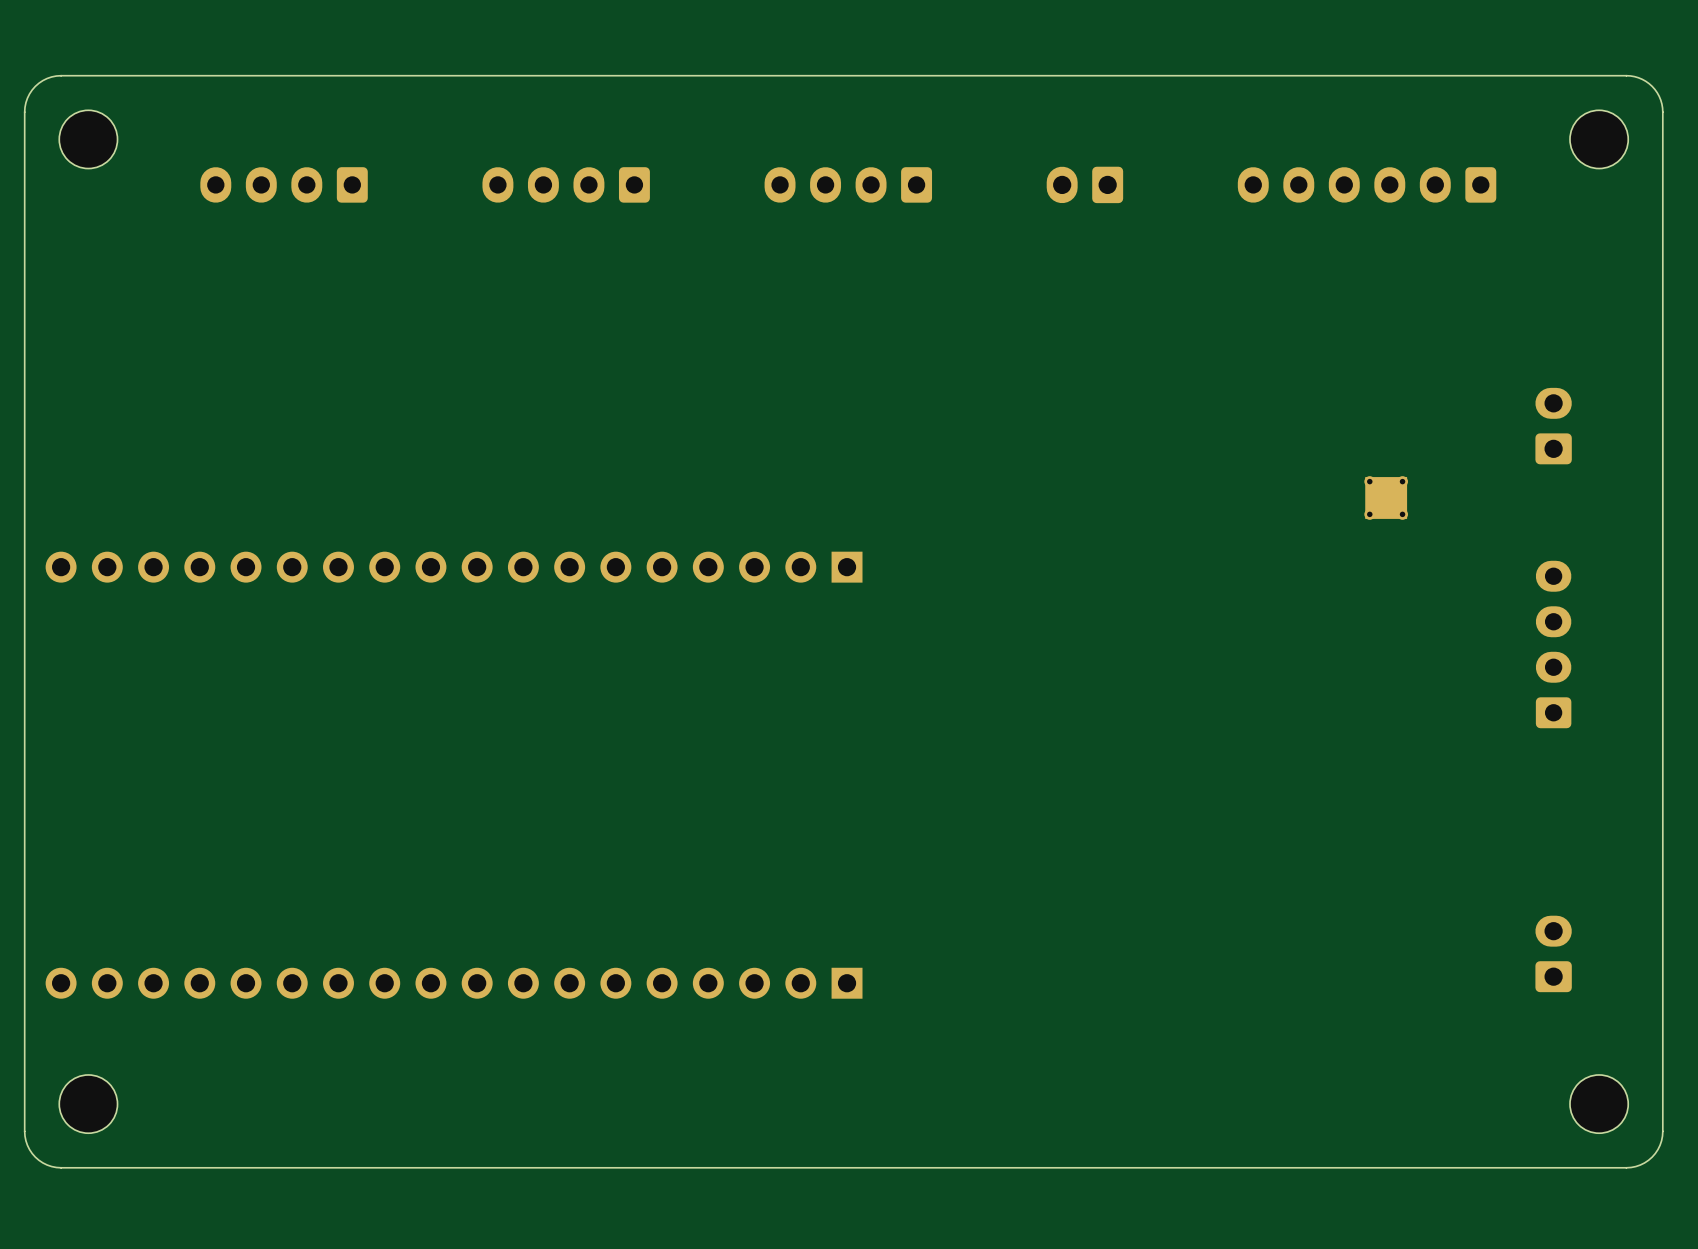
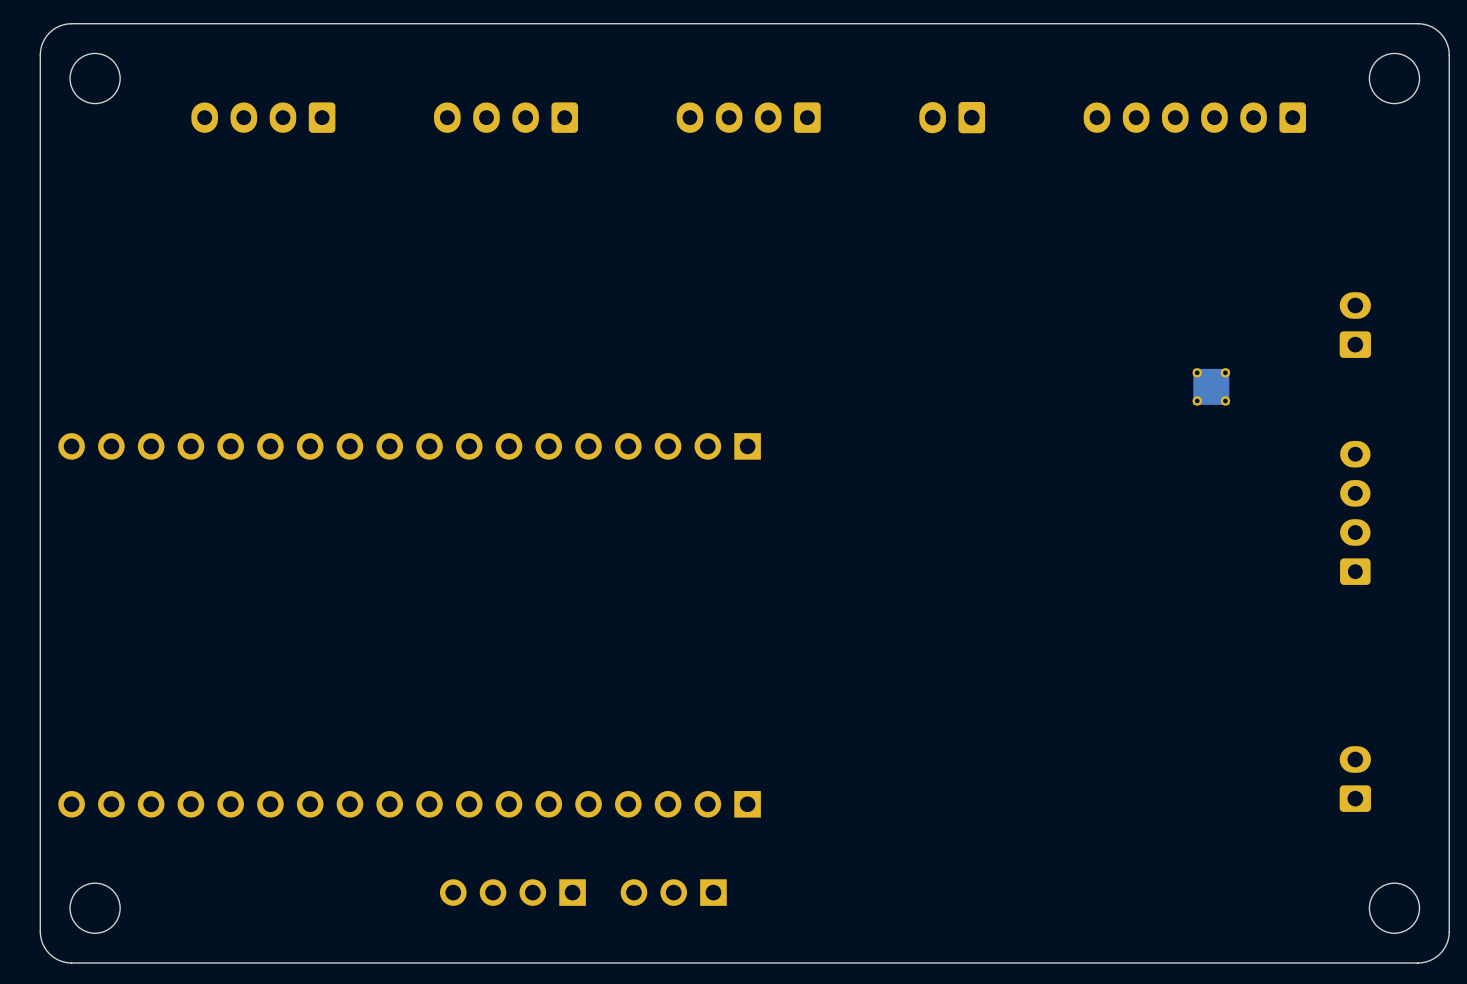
part: none -> (512, 892)
part: none -> (673, 892)

